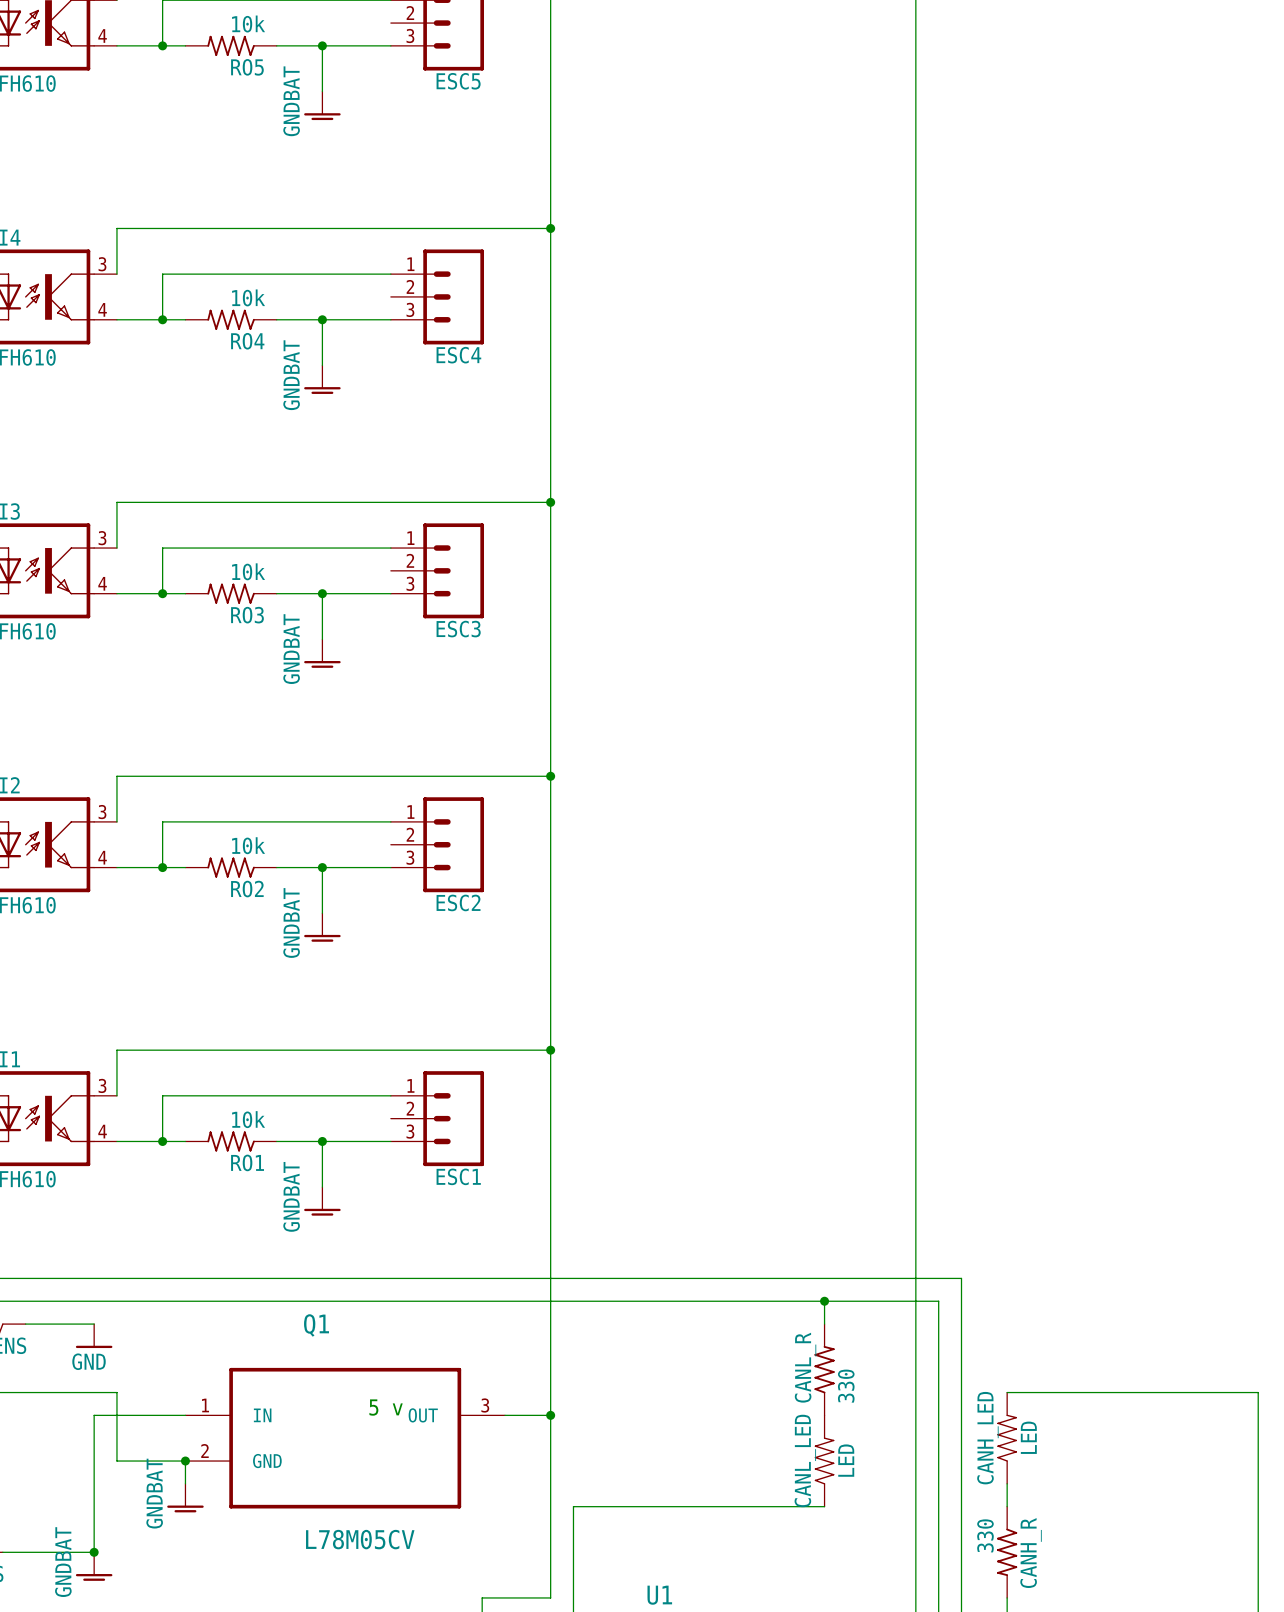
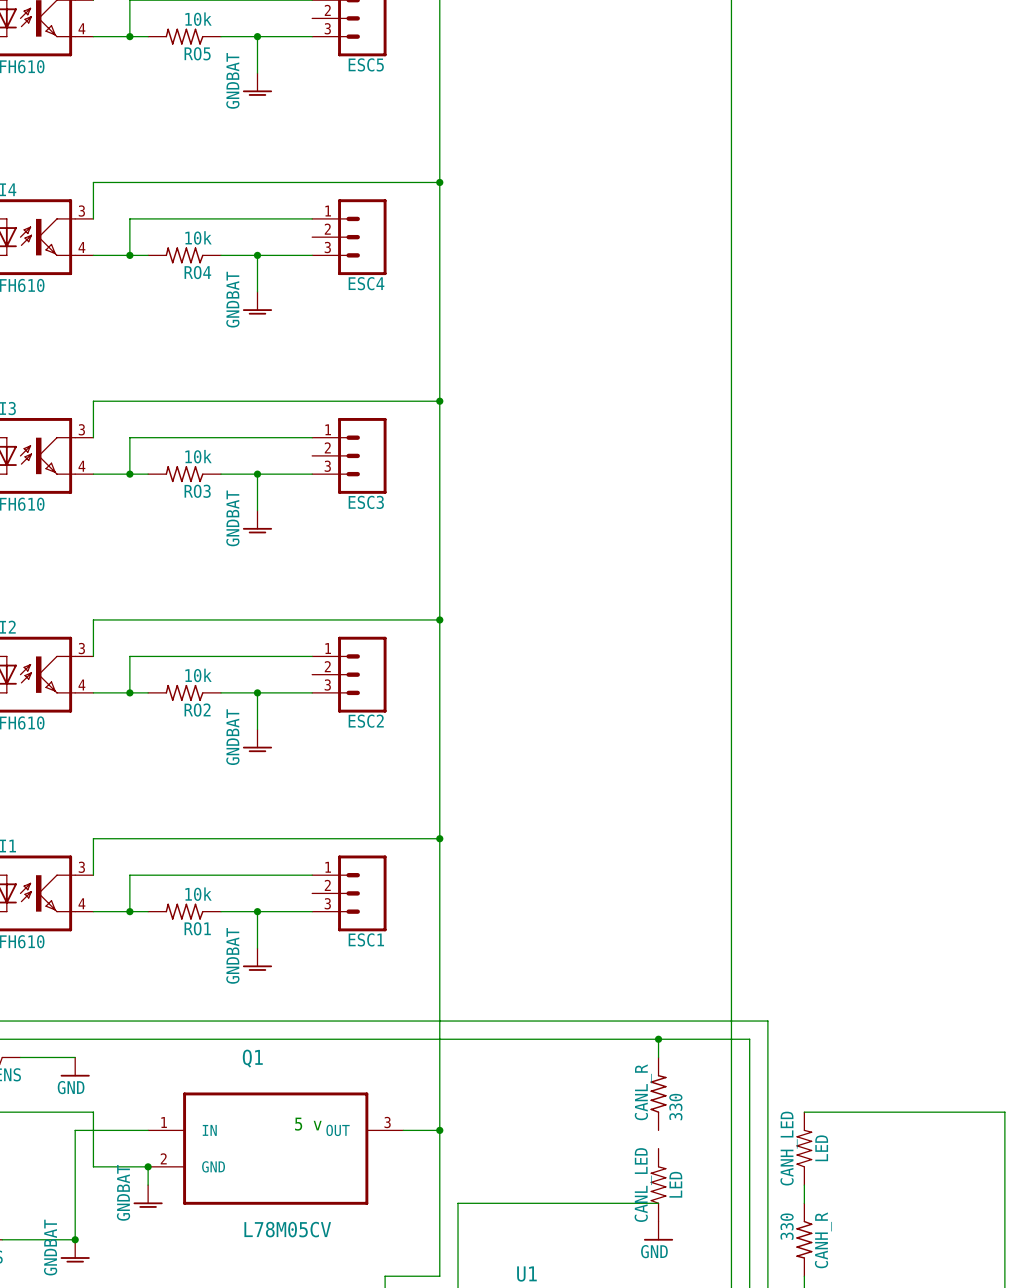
CANL_LED position: (824, 1461) -> (658, 1185)
power symbol: none -> GND (658, 1231)

